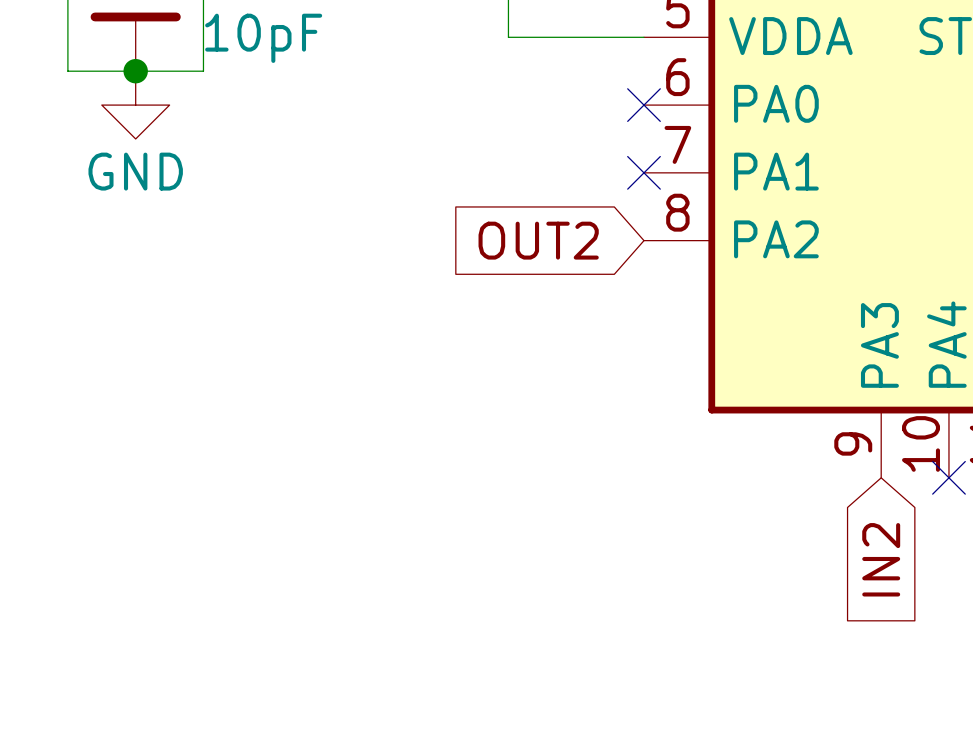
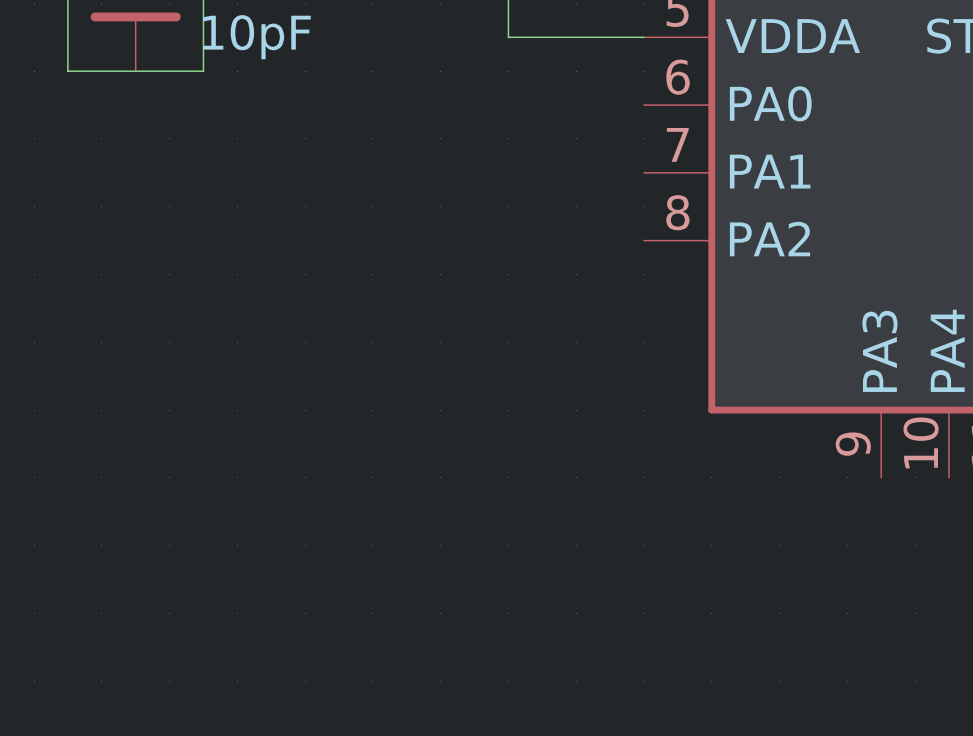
junction: (135, 71) -> none
power symbol: GND (135, 105) -> none
no-connect mark: (643, 105) -> none
no-connect mark: (643, 172) -> none
global label: OUT2 (538, 240) -> none
no-connect mark: (948, 477) -> none
global label: IN2 (881, 559) -> none

